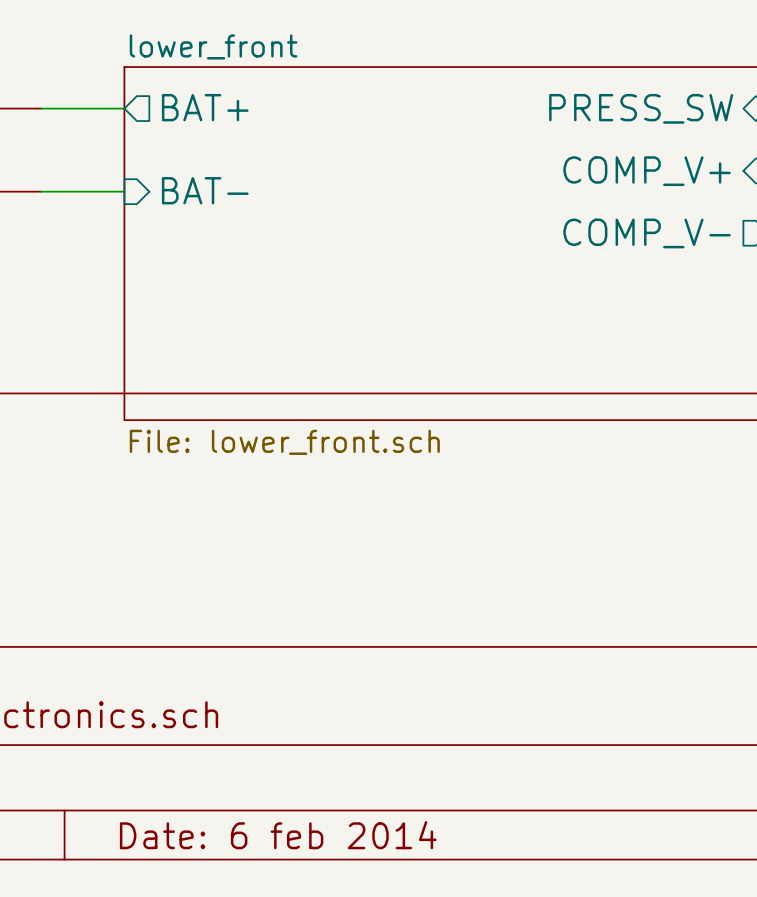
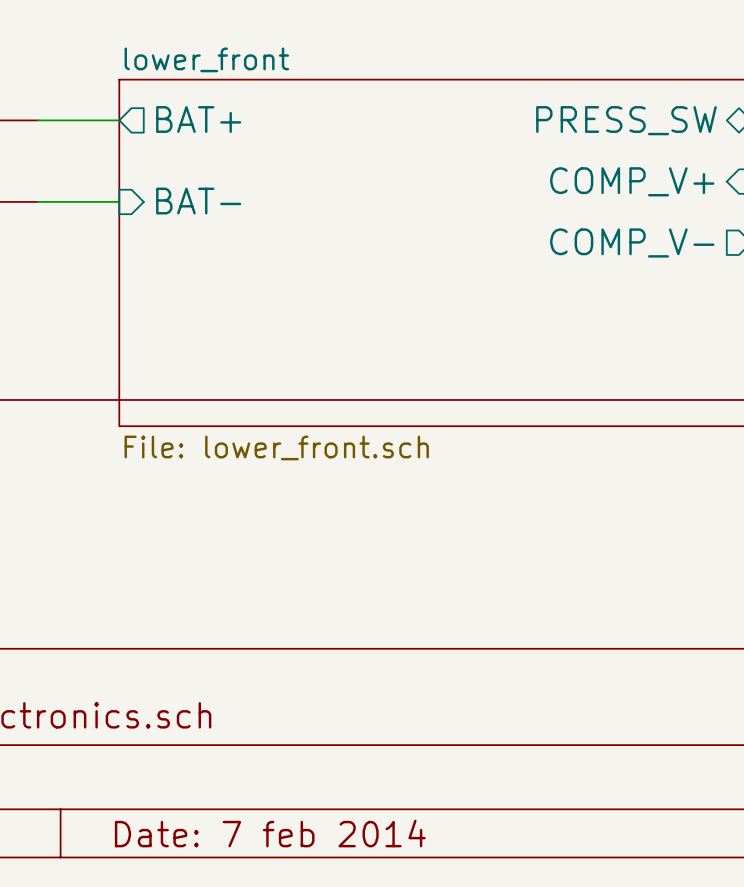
title block: Date: 6 feb 2014 (278, 835) -> Date: 7 feb 2014 (270, 833)

